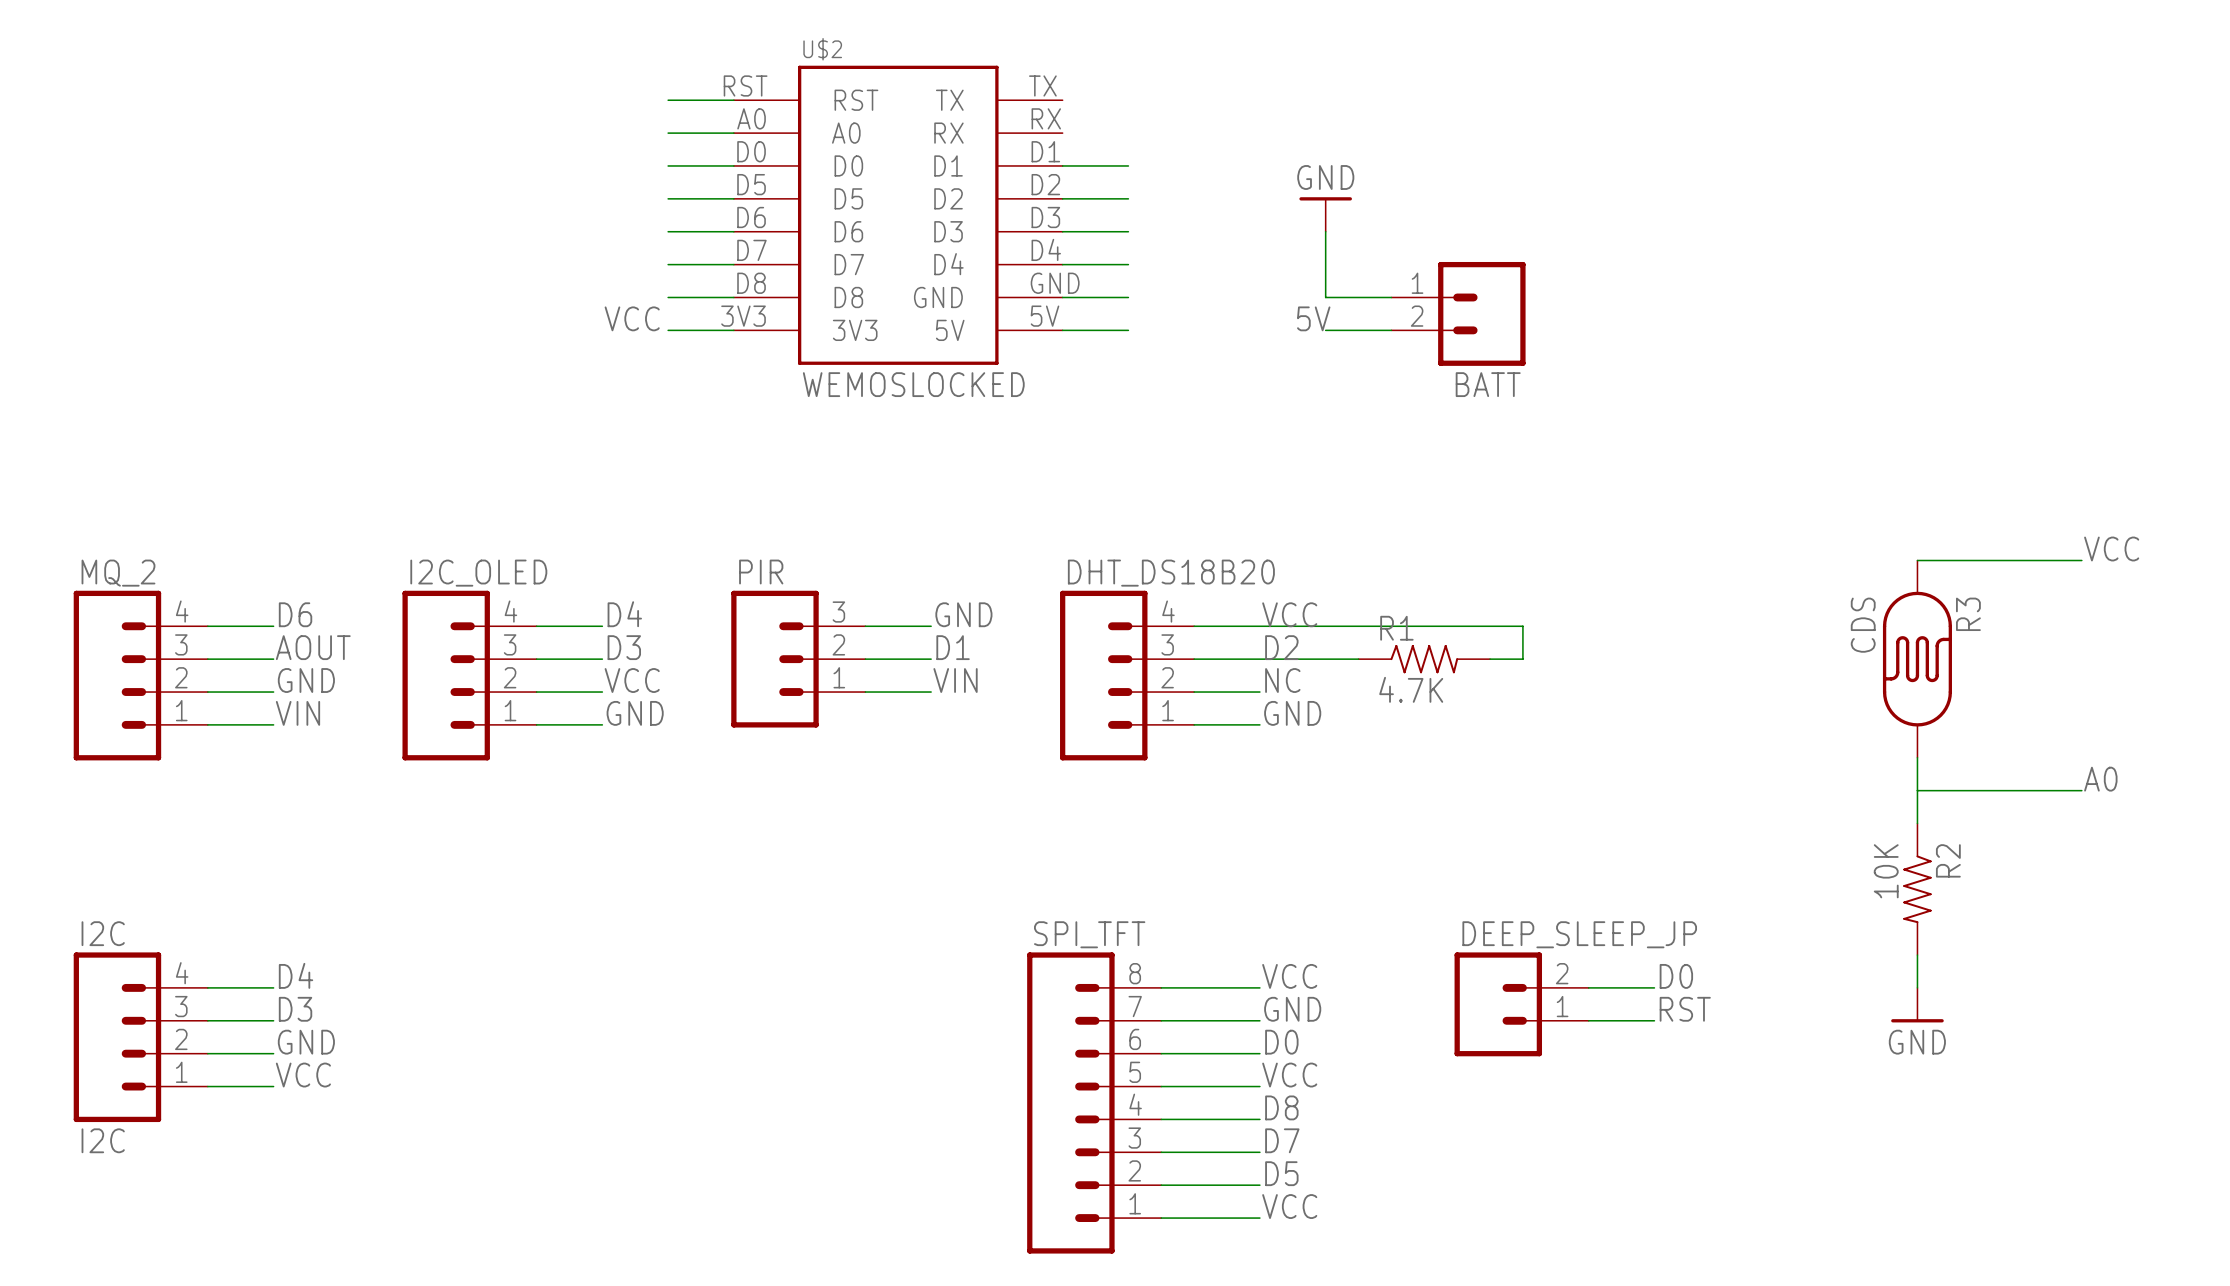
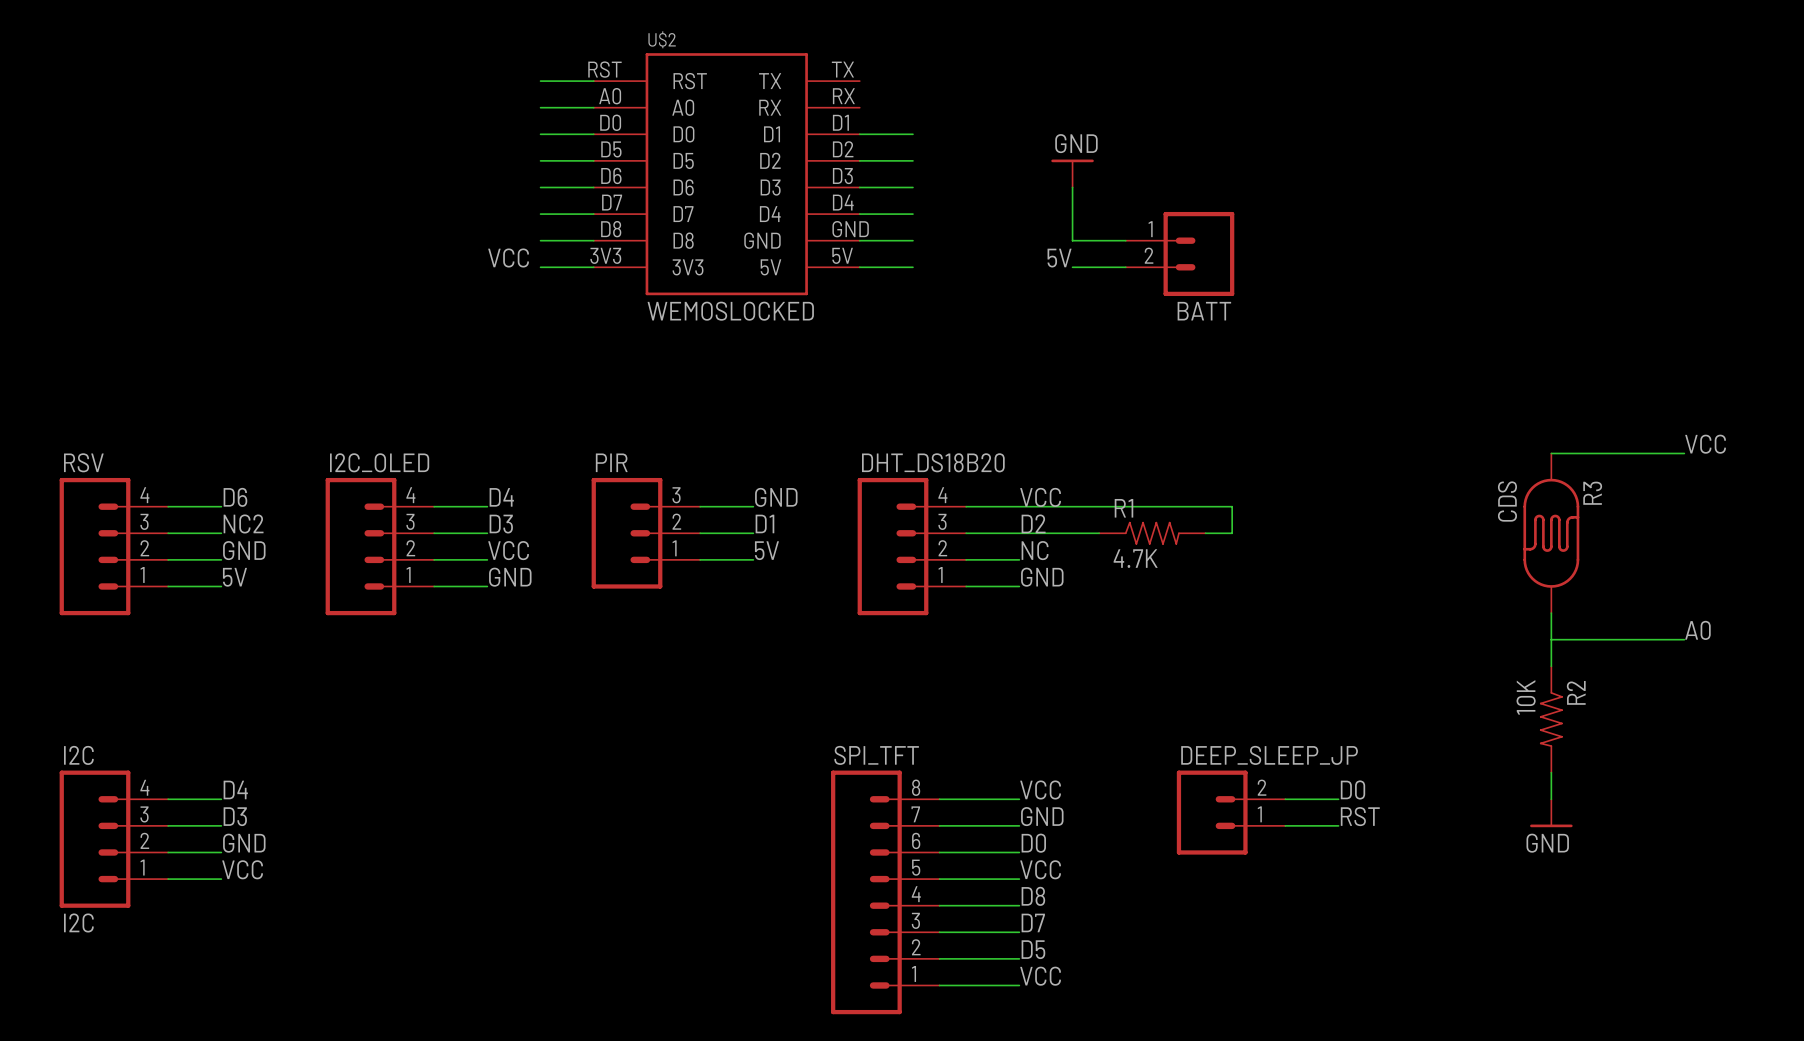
MQ_2 name: MQ_2 (118, 573) -> RSV (83, 462)
label: AOUT (313, 647) -> NC2 (243, 523)
label: VIN (955, 680) -> 5V (766, 550)
label: VIN (297, 713) -> 5V (234, 577)

